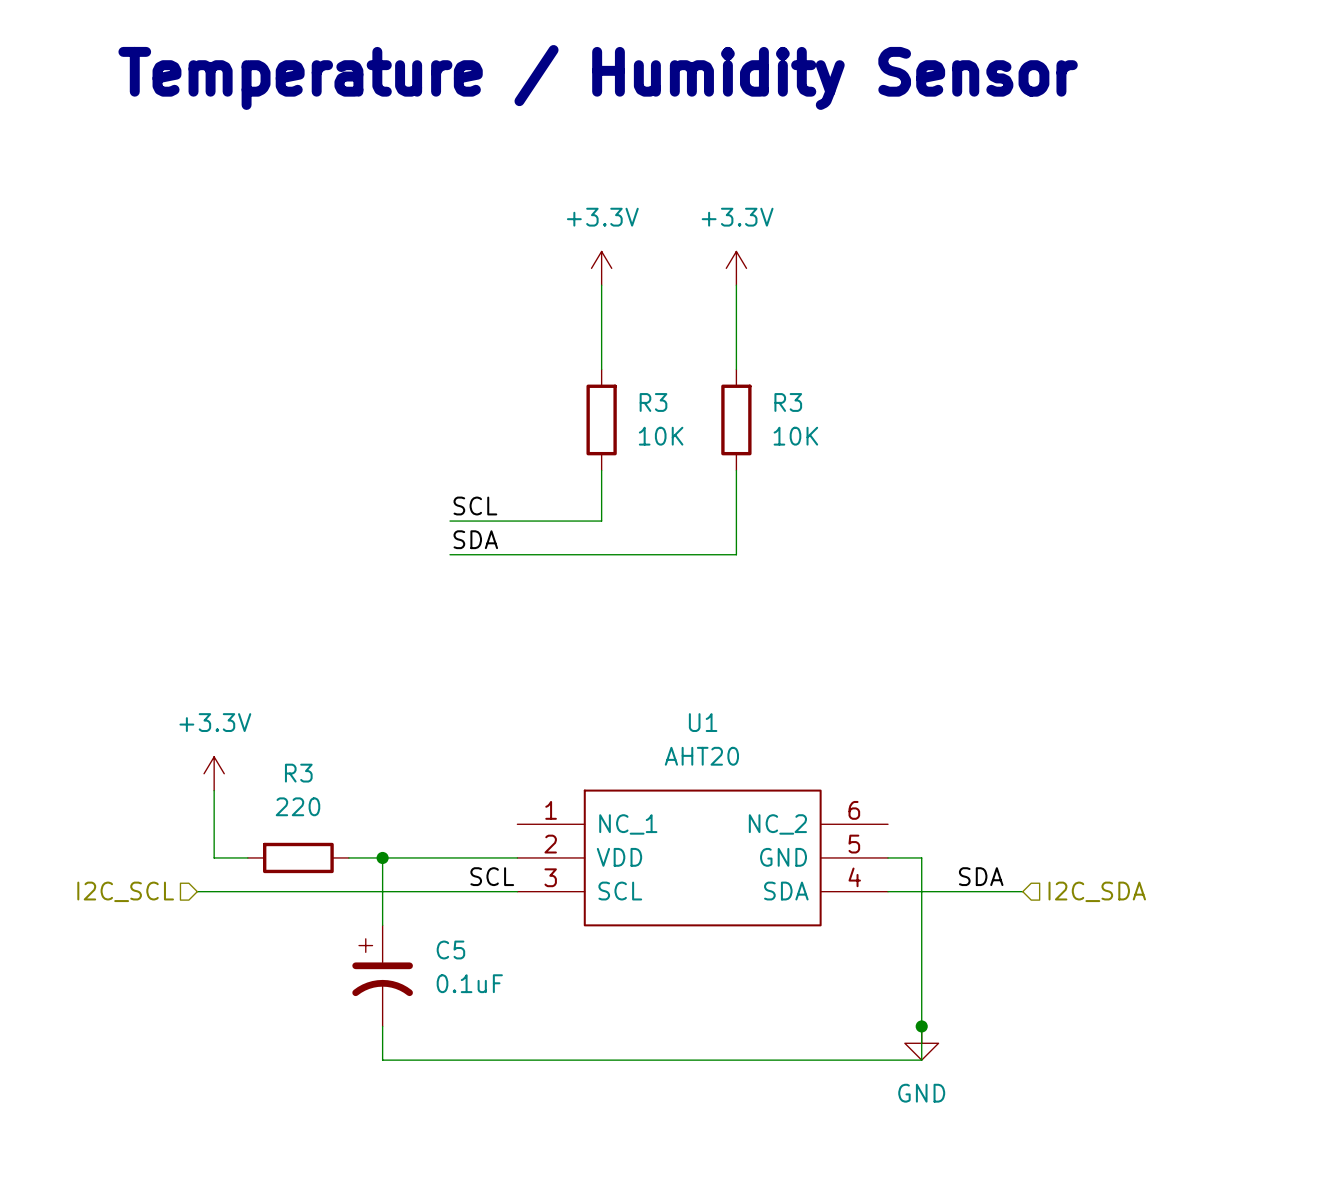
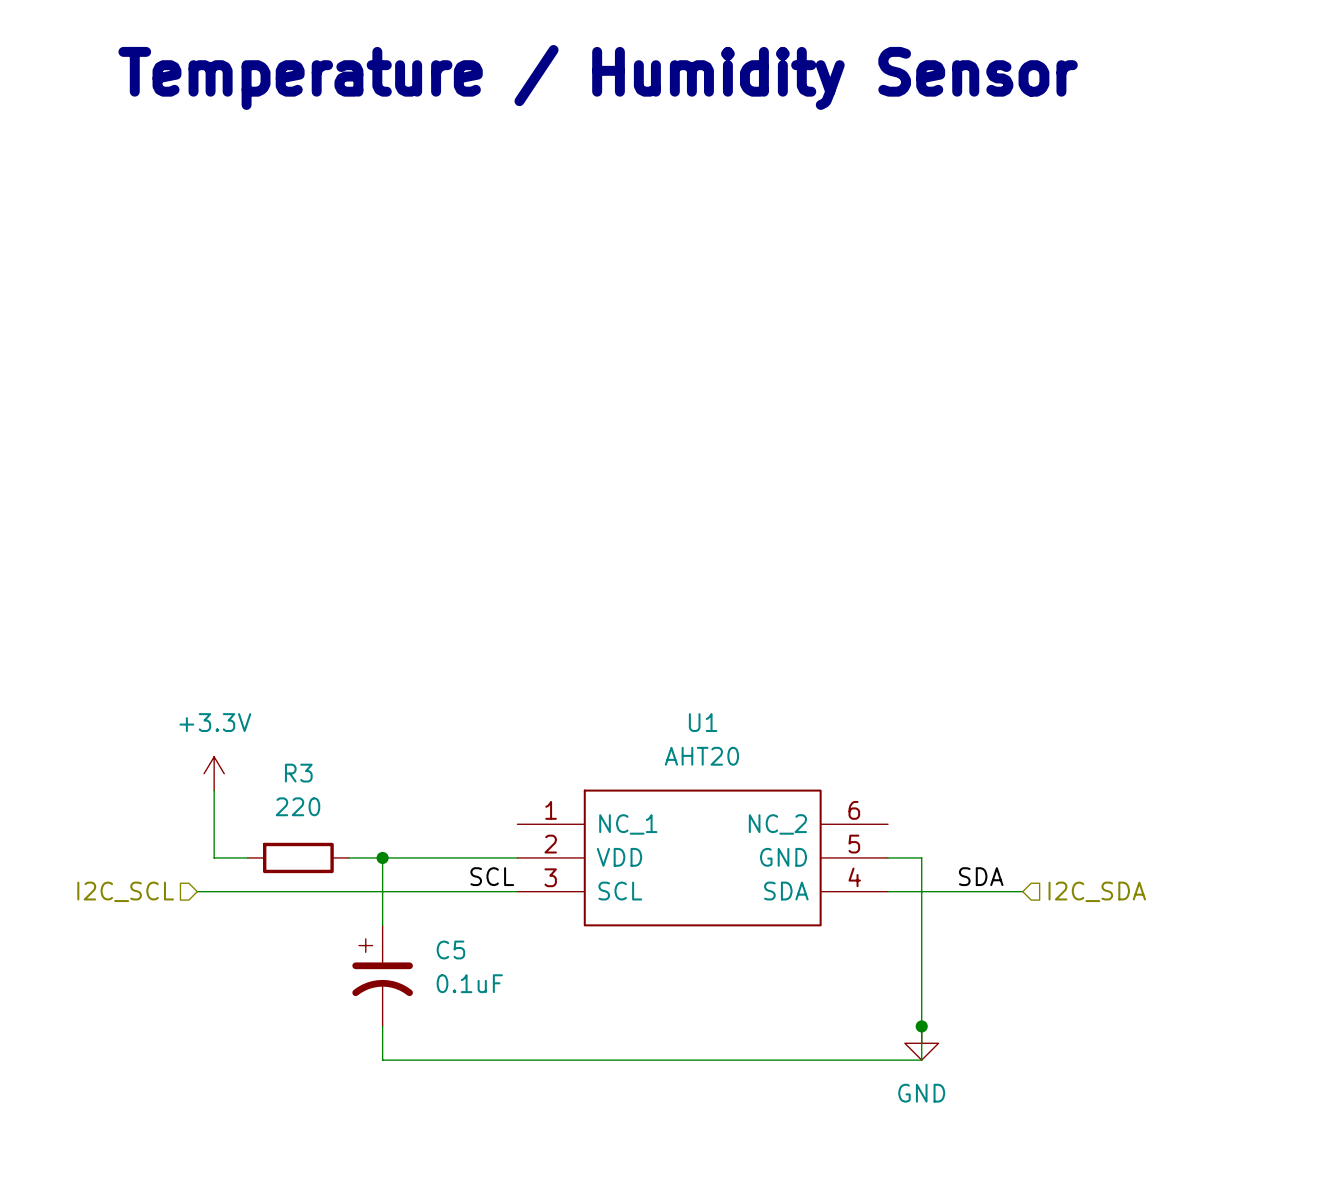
power symbol: +3.3V (601, 268) -> none
power symbol: +3.3V (736, 268) -> none
wire: (601, 285) (601, 369) -> none
wire: (736, 285) (736, 369) -> none
R3: 10K (601, 419) -> none
R3: 10K (736, 419) -> none
wire: (601, 470) (601, 521) (450, 521) -> none
wire: (736, 470) (736, 554) (450, 554) -> none
label: SCL (475, 506) -> none
label: SDA (475, 539) -> none

